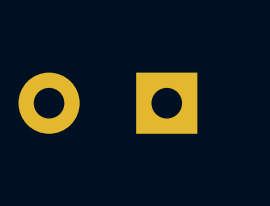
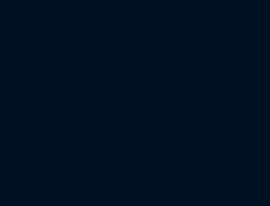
part: (107, 103) -> none

